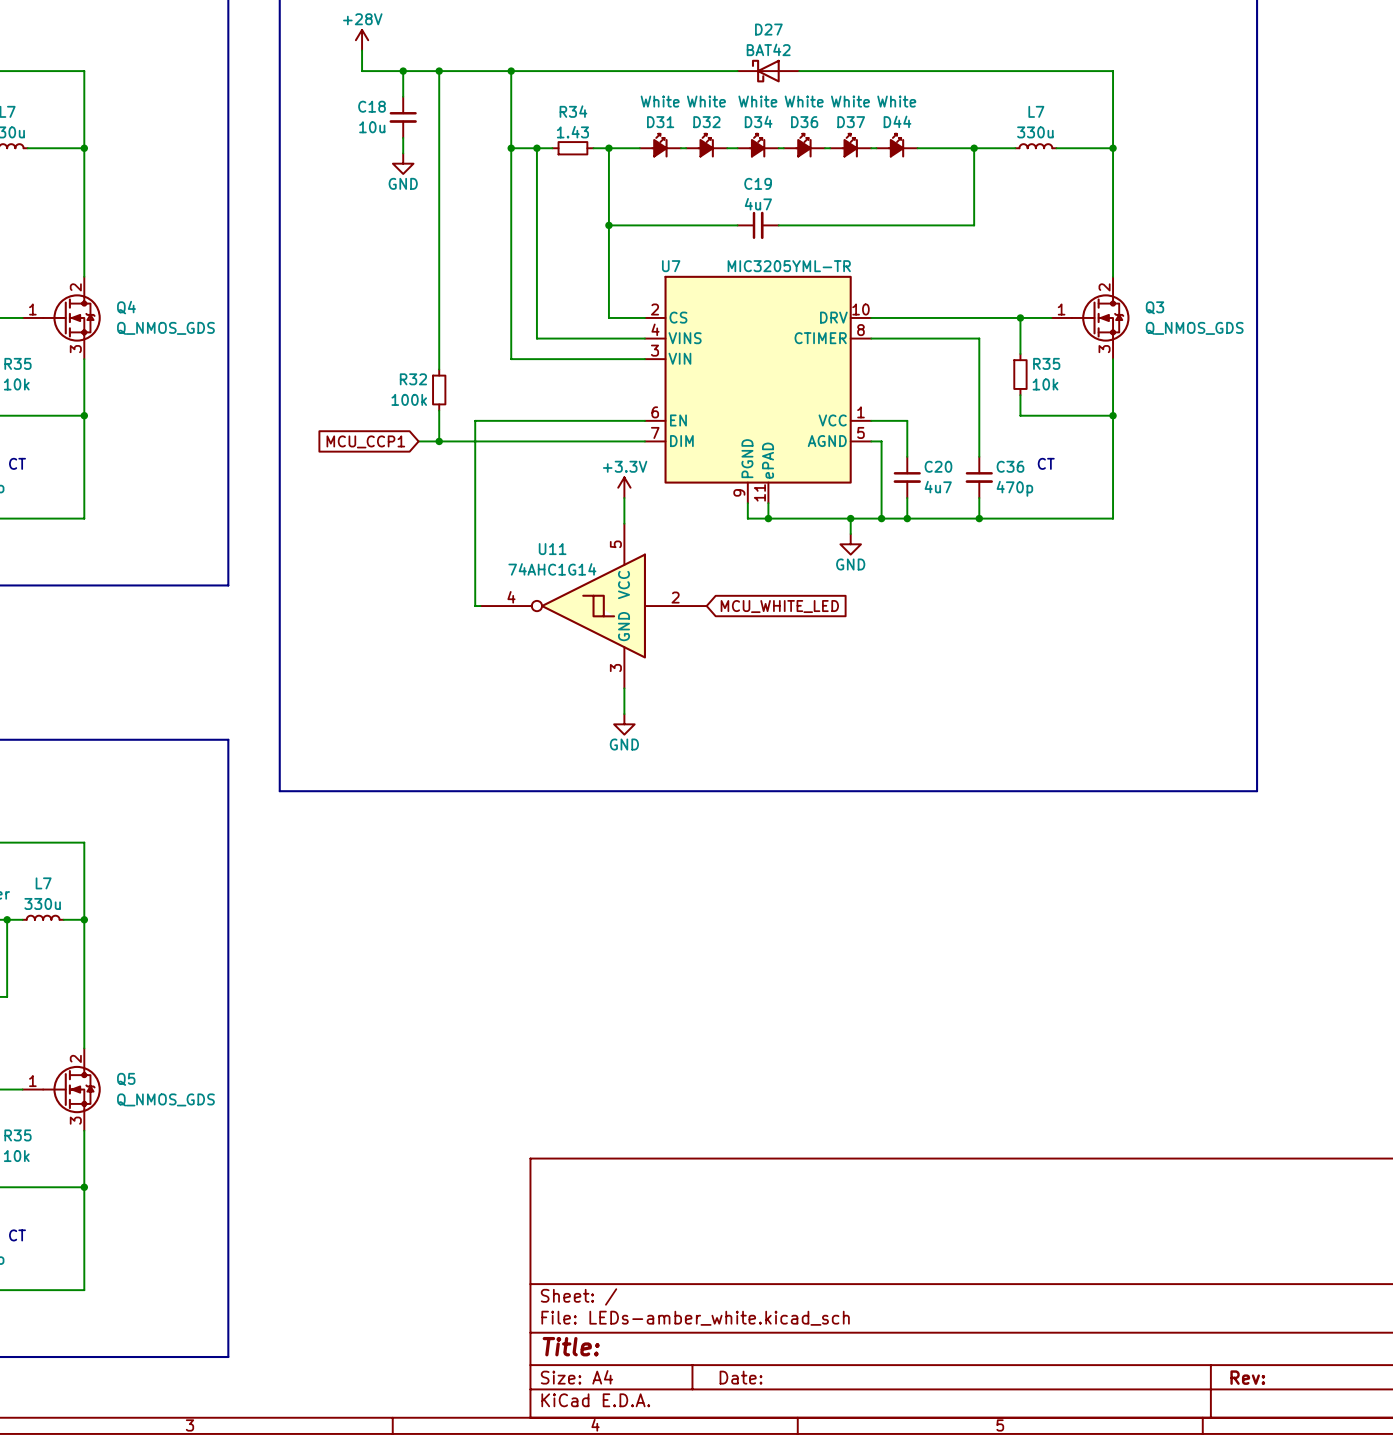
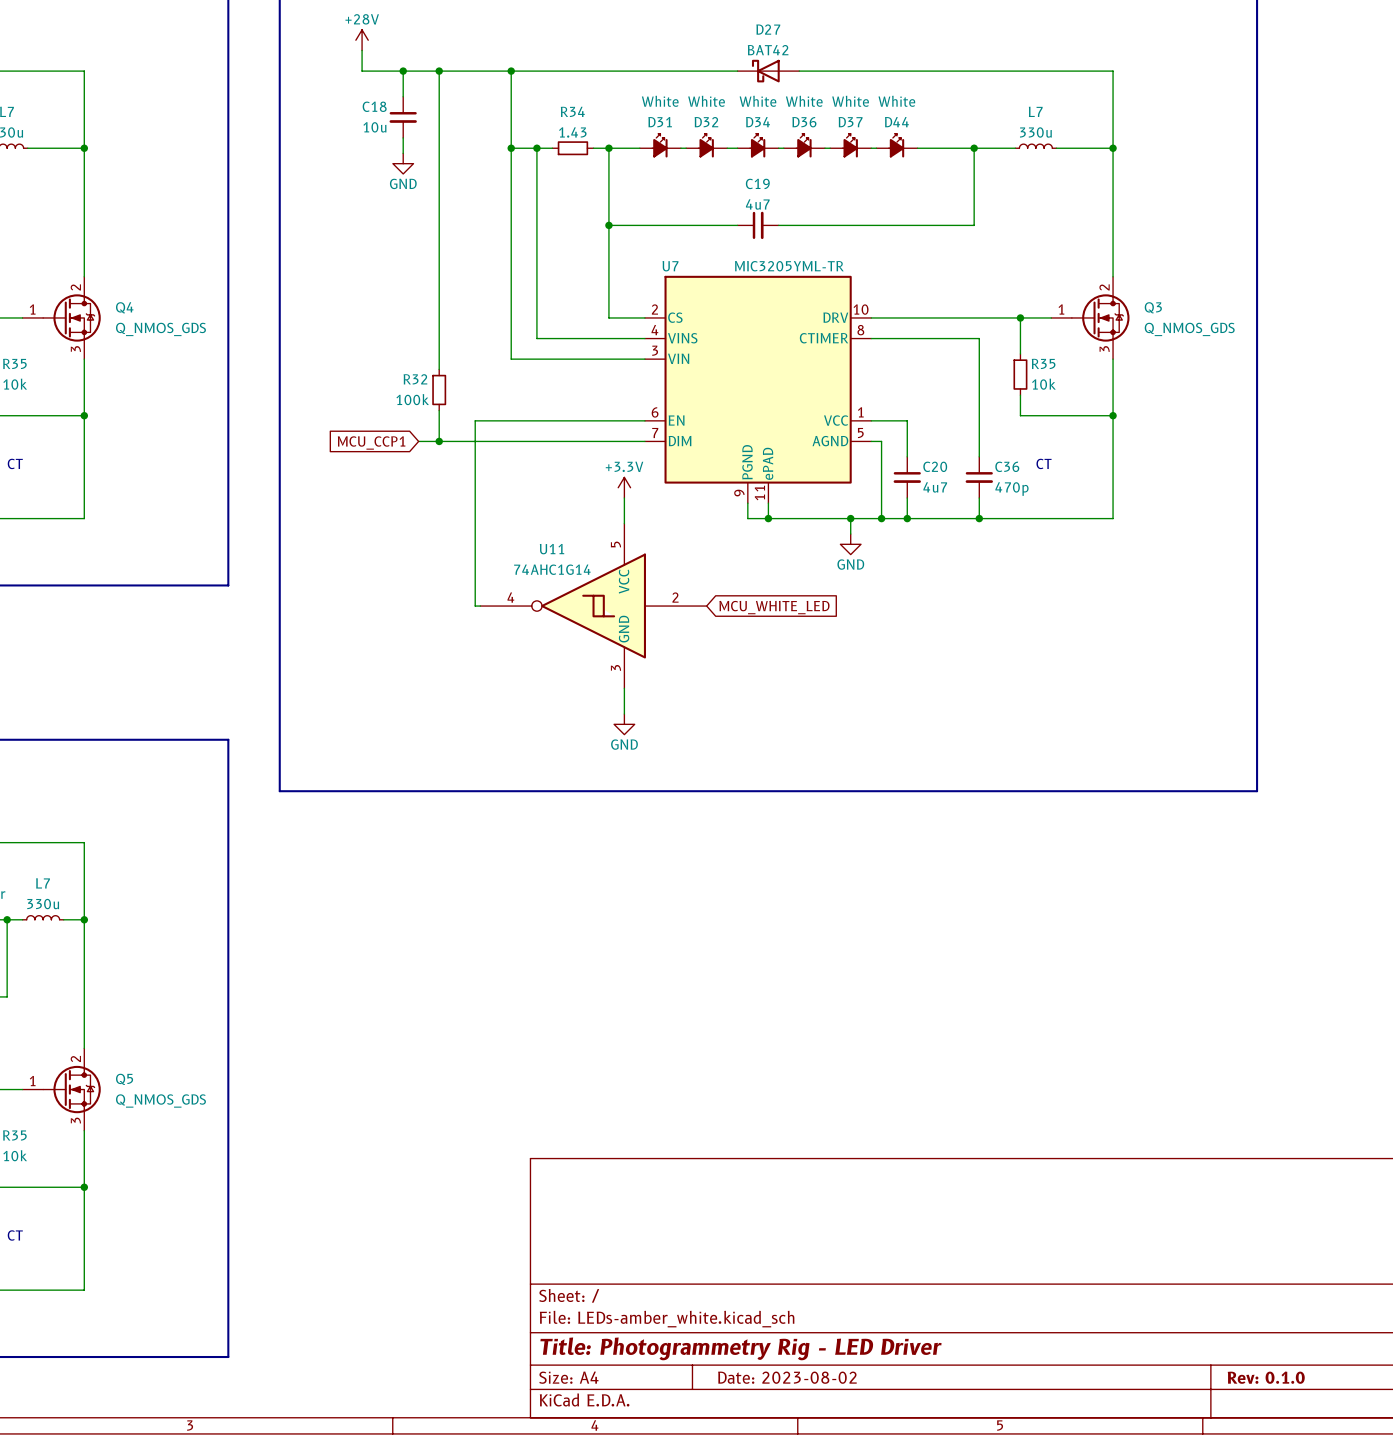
title block: Title: (571, 1346) -> Title: Photogrammetry Rig - LED Driver (741, 1348)
title block: Date: (741, 1377) -> Date: 2023-08-02 (787, 1377)
title block: Rev: (1247, 1377) -> Rev: 0.1.0 (1266, 1377)

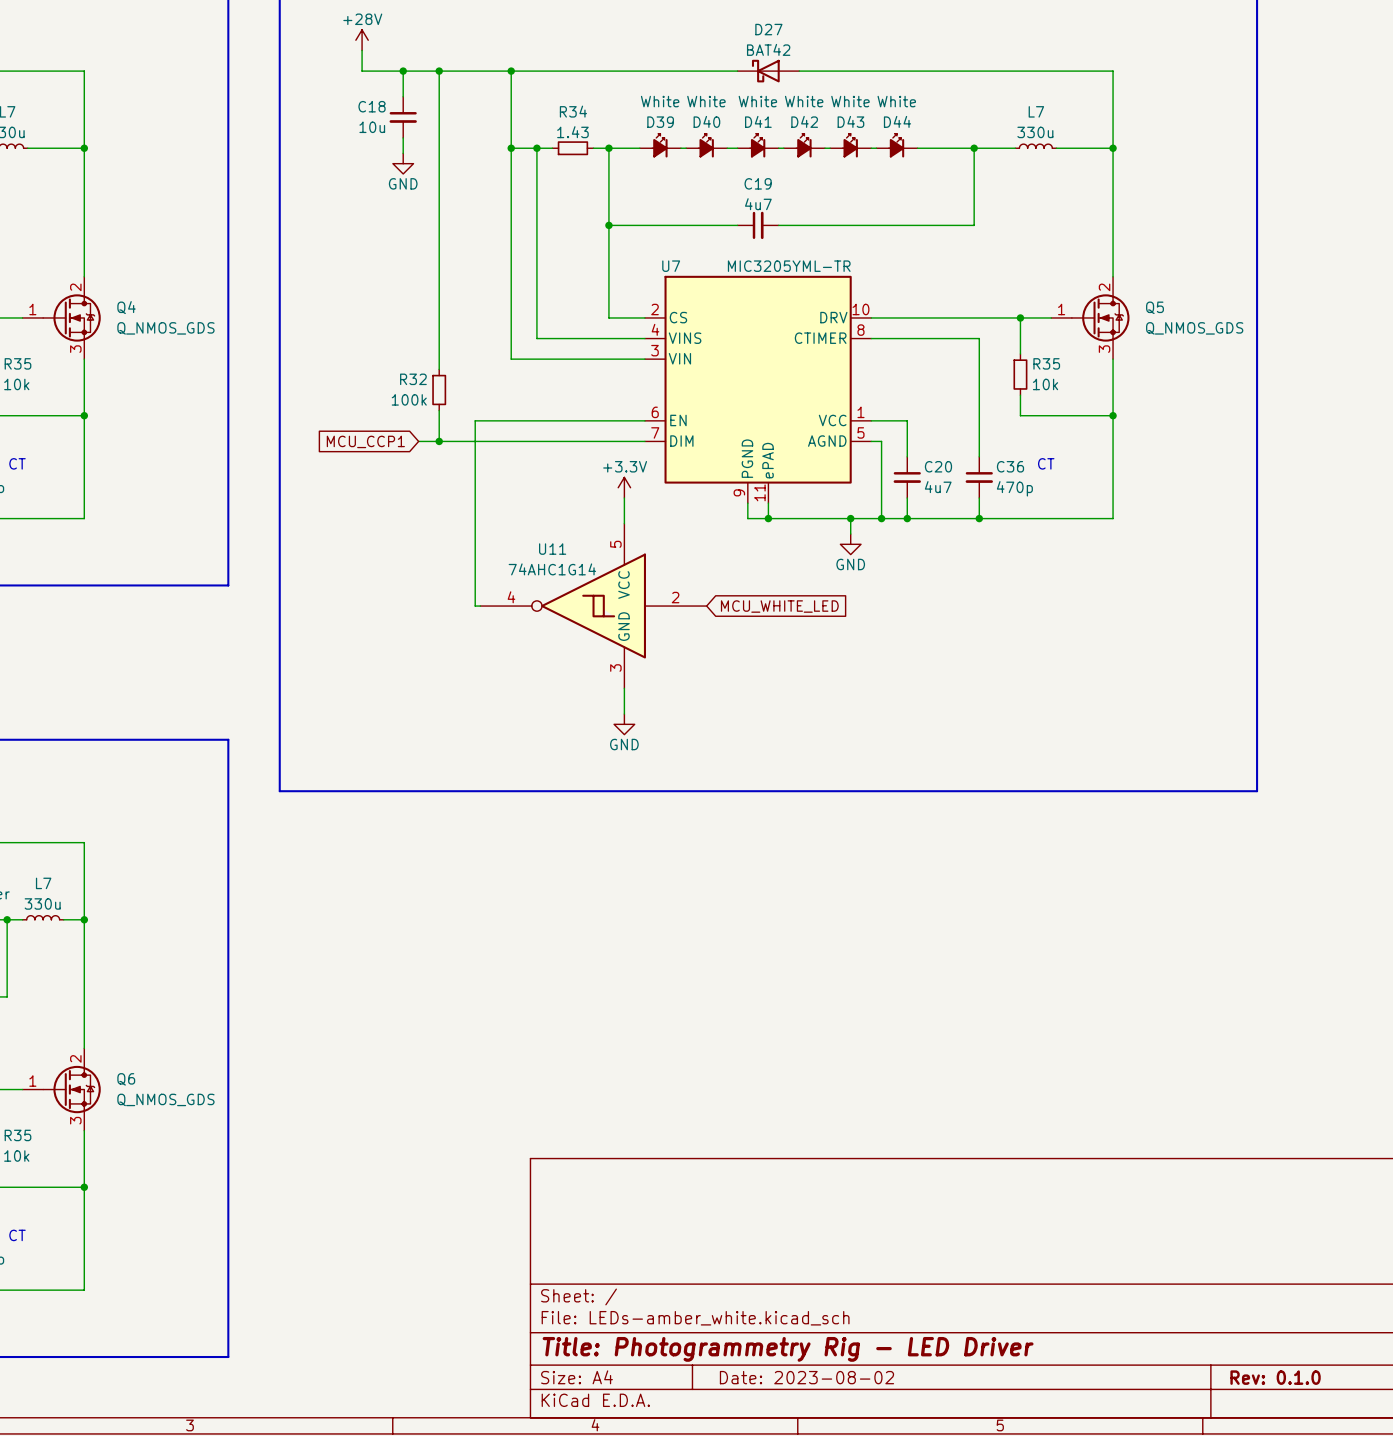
D31 name: D31 (660, 122) -> D39 (660, 122)
D32 name: D32 (706, 122) -> D40 (706, 121)
D34 name: D34 (758, 122) -> D41 (758, 121)
D36 name: D36 (804, 122) -> D42 (804, 121)
D37 name: D37 (850, 122) -> D43 (850, 121)
Q3 name: Q3 (1153, 307) -> Q5 (1154, 307)
Q5 name: Q5 (124, 1079) -> Q6 (126, 1079)

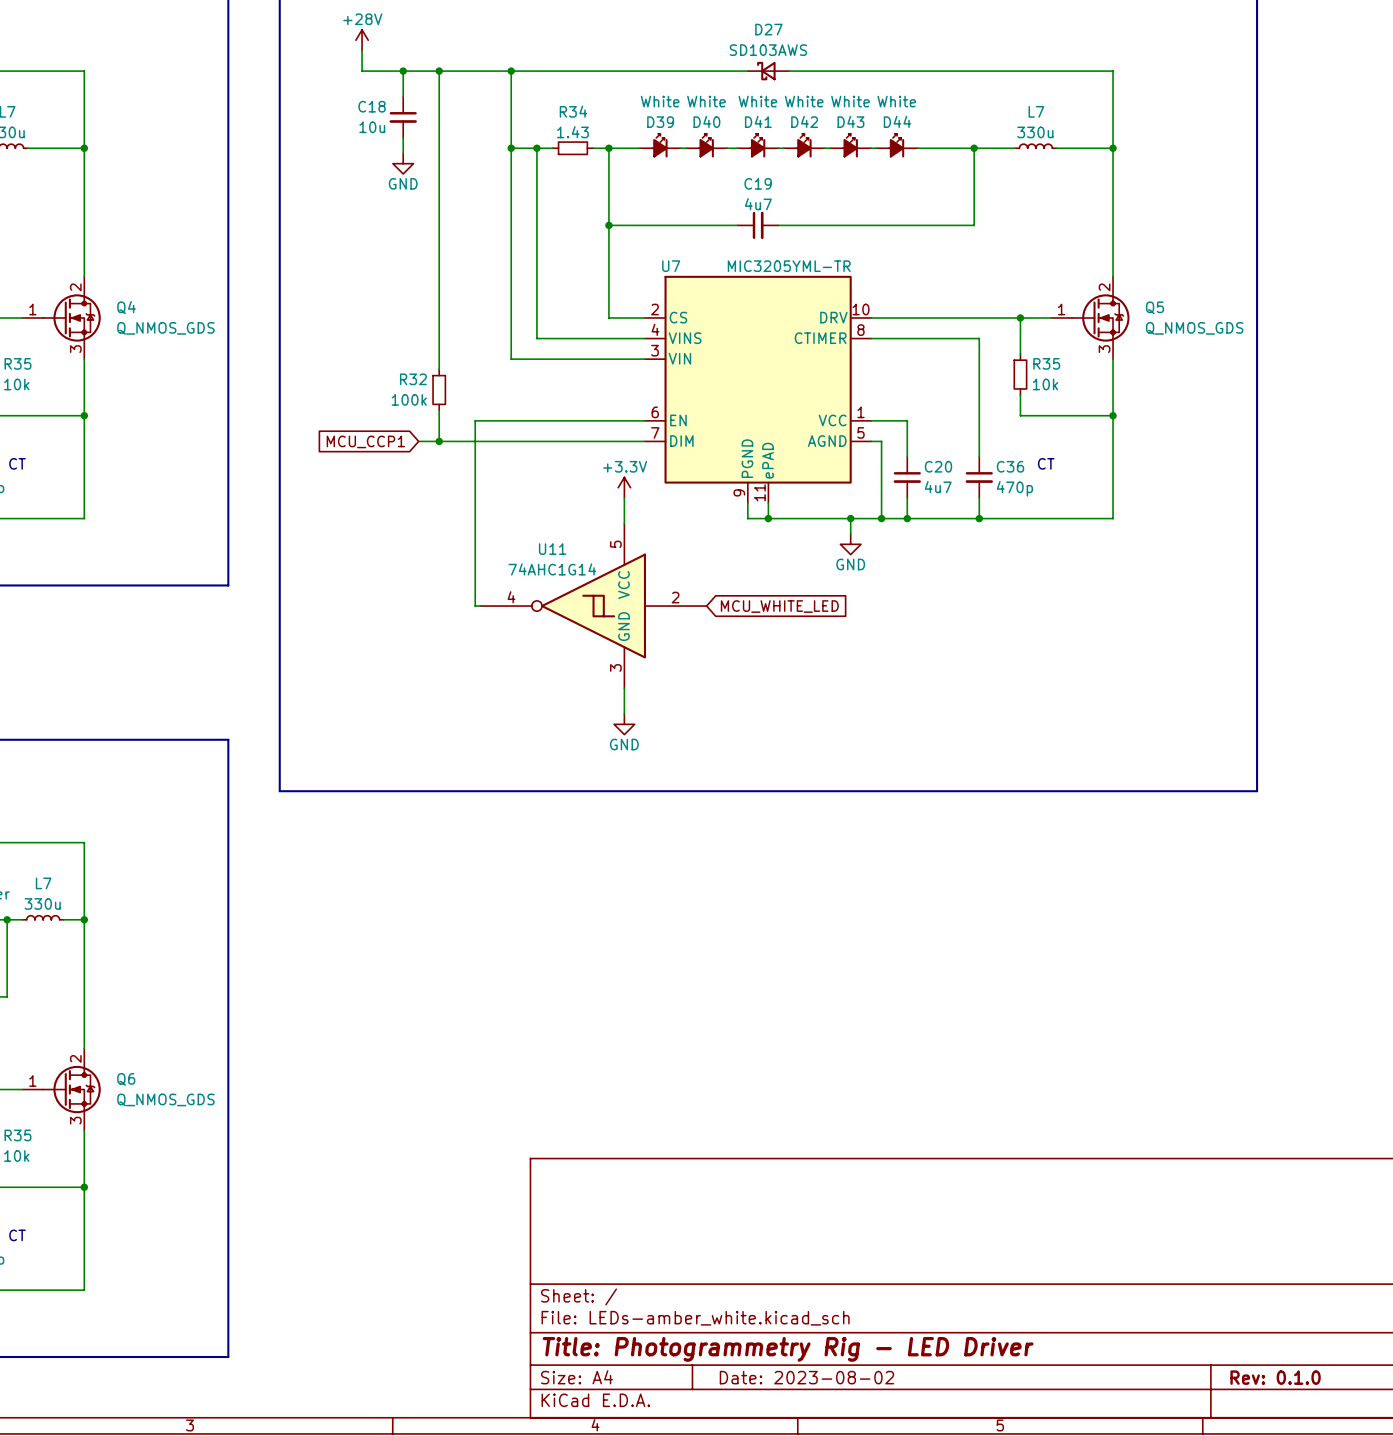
D27 value: BAT42 (768, 49) -> SD103AWS (768, 50)
D27 symbol: [737, 59, 800, 83] -> [747, 61, 789, 81]

